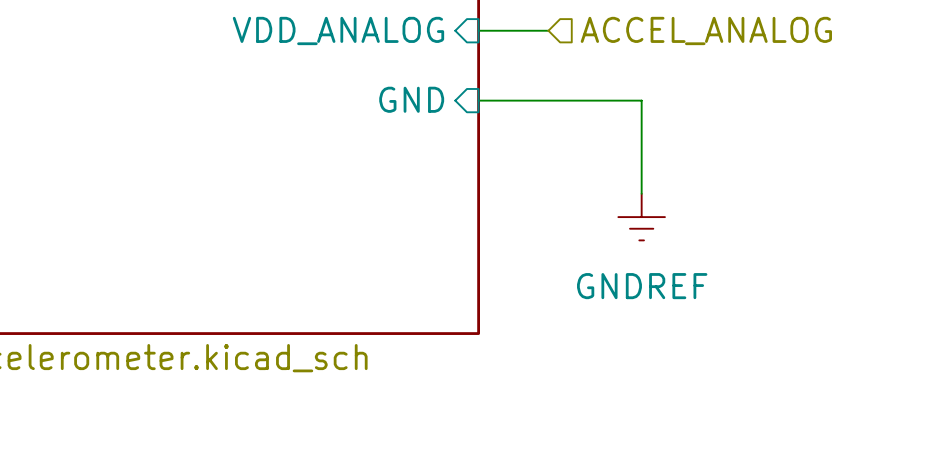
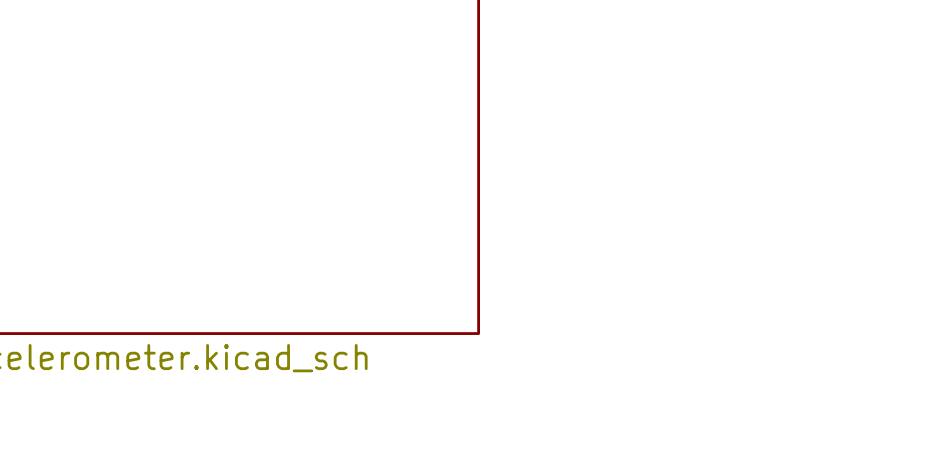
sheet pin: VDD_ANALOG (338, 30) -> none
wire: (478, 30) (548, 30) -> none
hierarchical label: ACCEL_ANALOG (706, 30) -> none
sheet pin: GND (411, 99) -> none
wire: (478, 100) (641, 100) (641, 193) -> none
power symbol: GNDREF (641, 217) -> none

